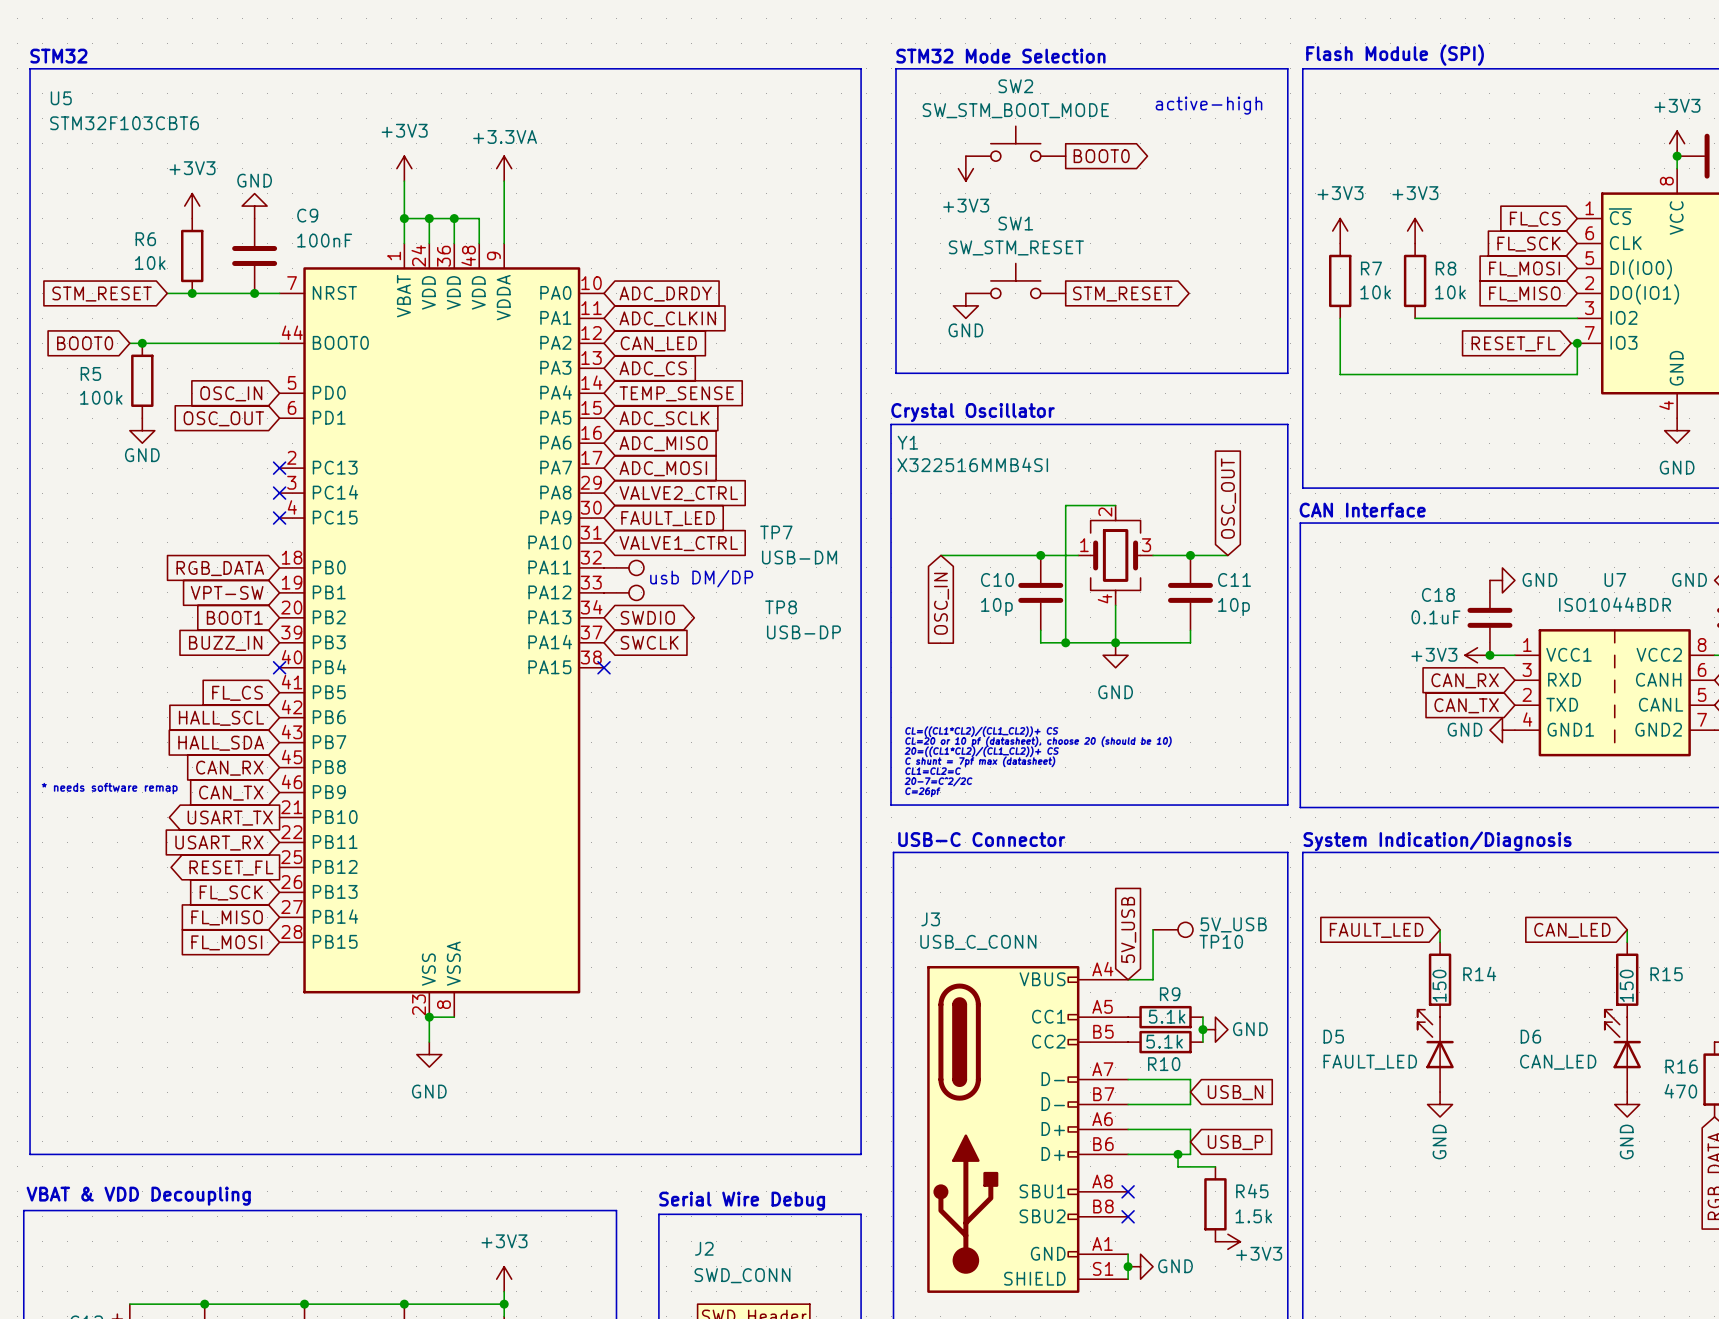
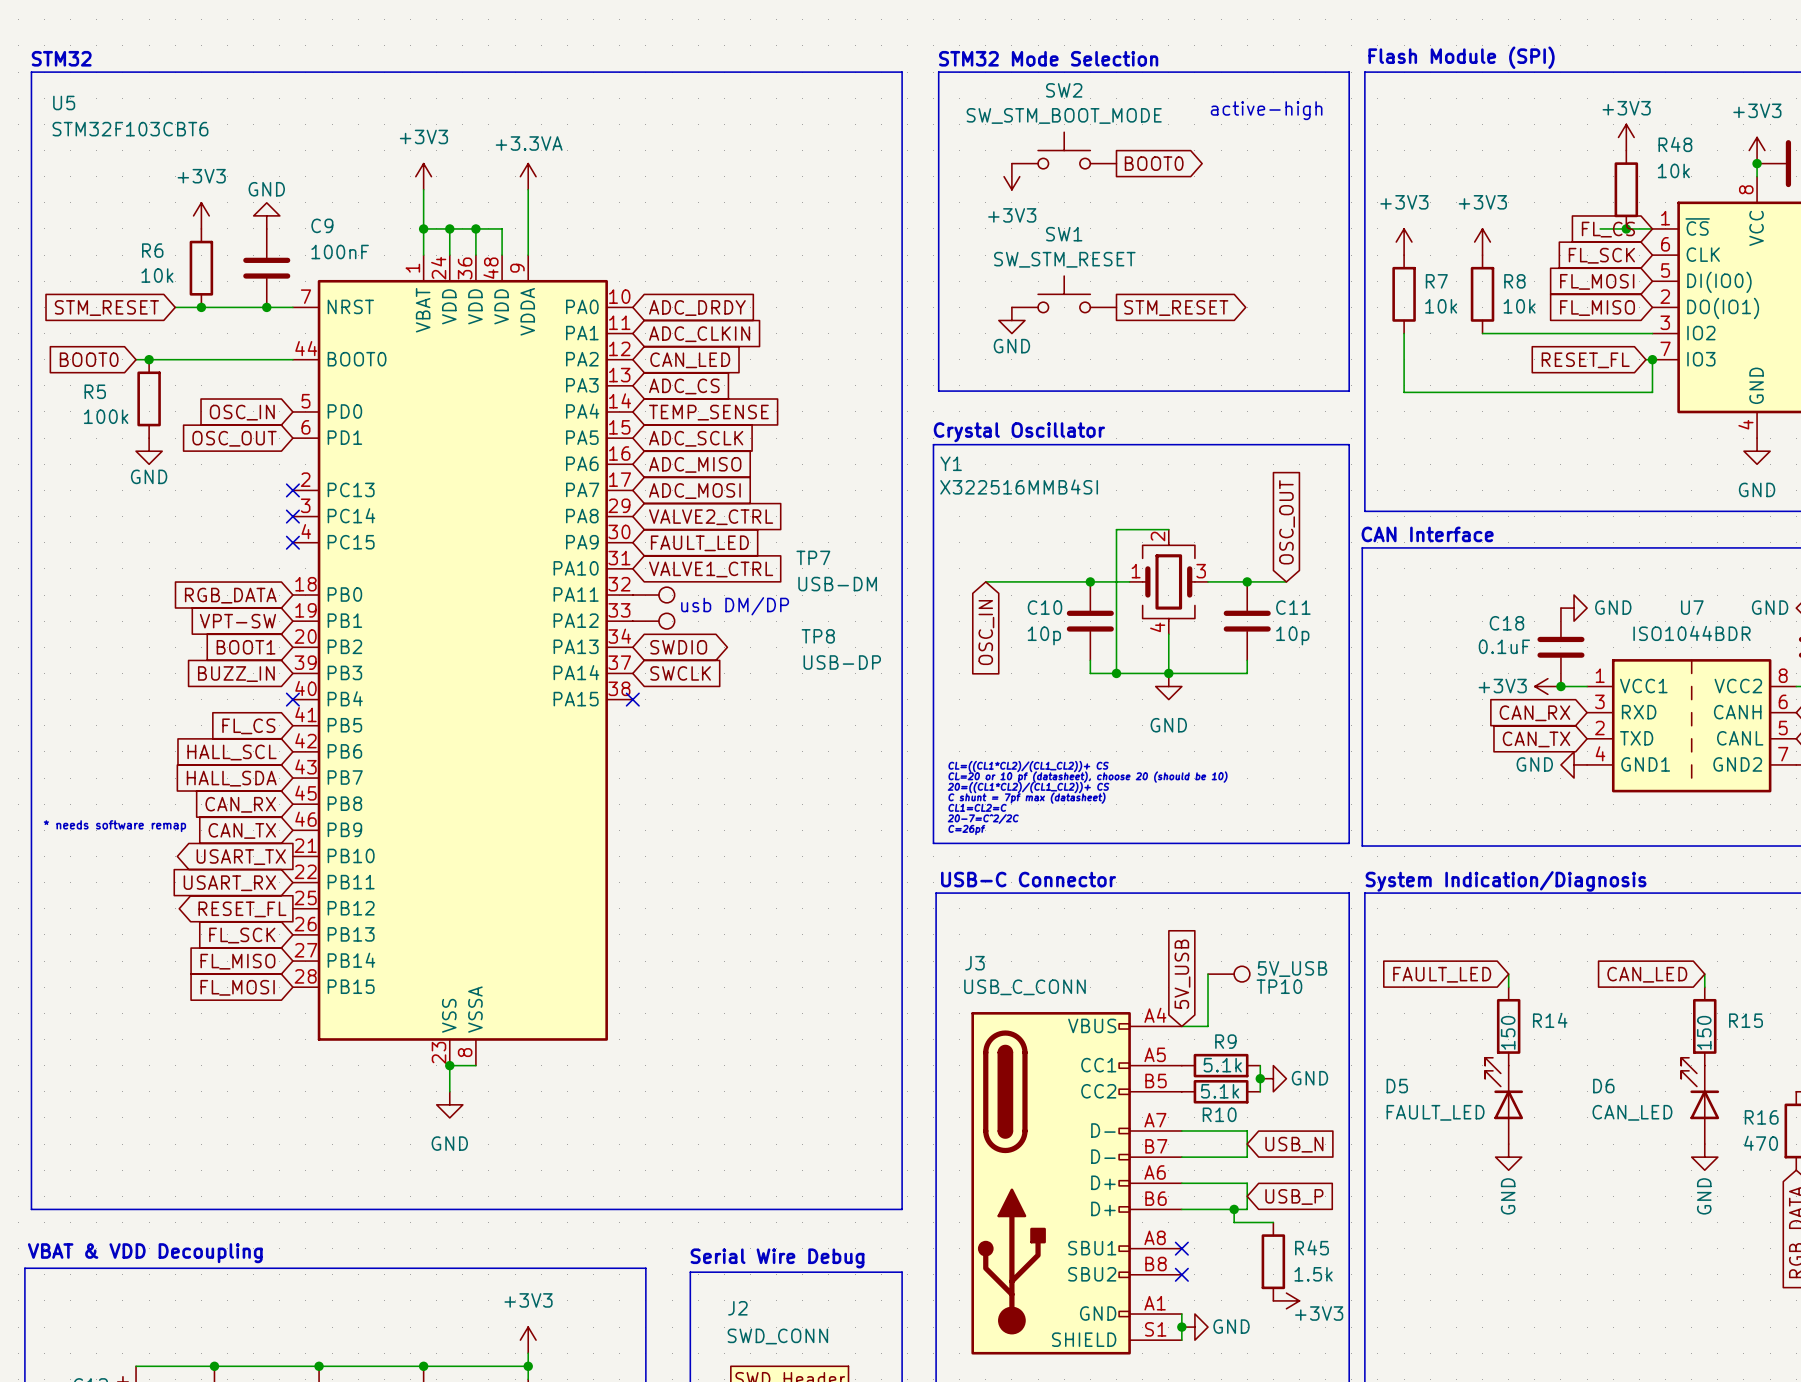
power symbol: none -> +3V3 (1626, 137)
R48: none -> 10k (1626, 189)
wire: none -> (1600, 228) (1652, 228)
junction: none -> (1626, 228)

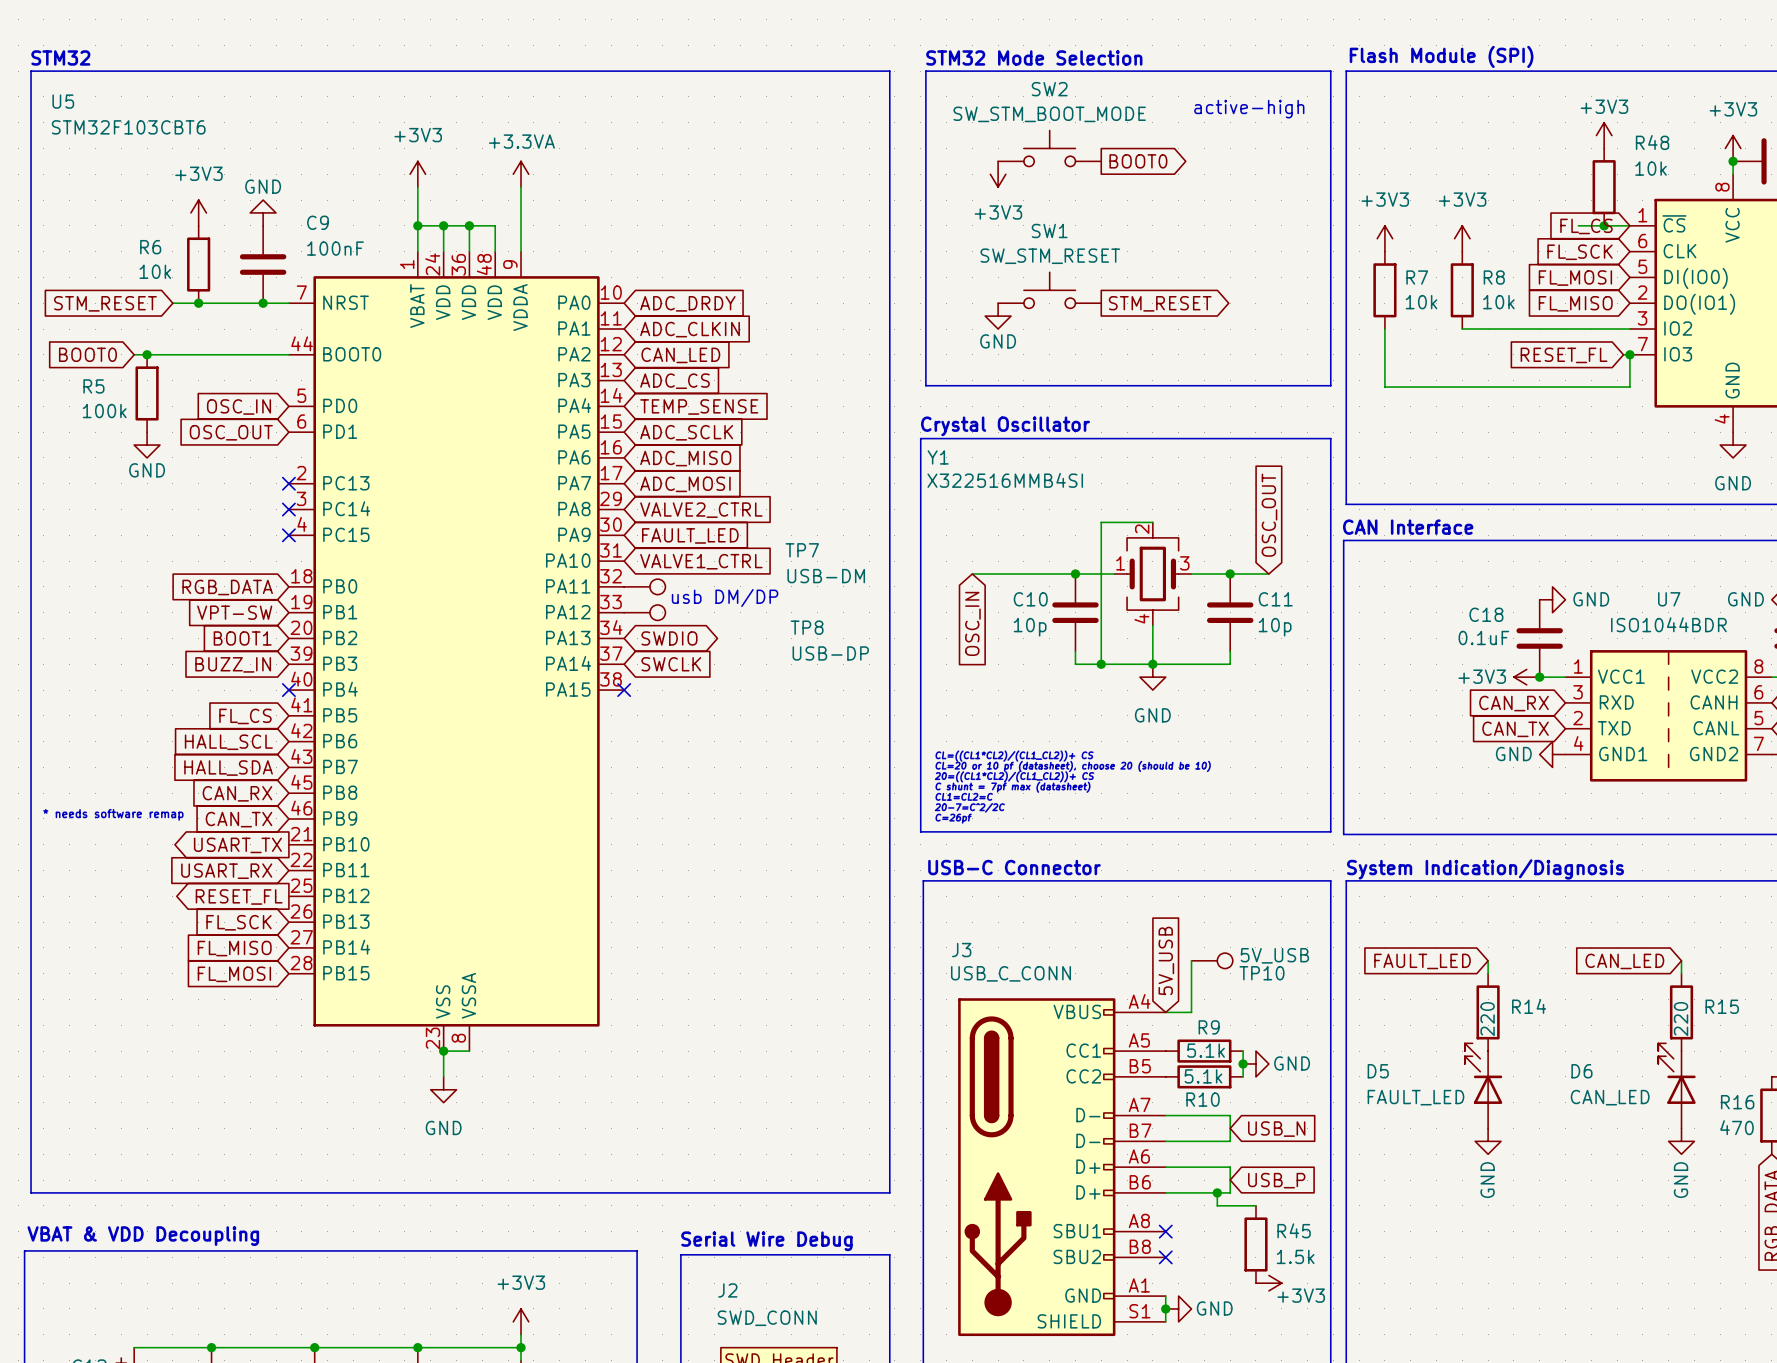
R14 value: 150 (1508, 1032) -> 220 (1487, 1019)
R15 value: 150 (1704, 1032) -> 220 (1681, 1019)

